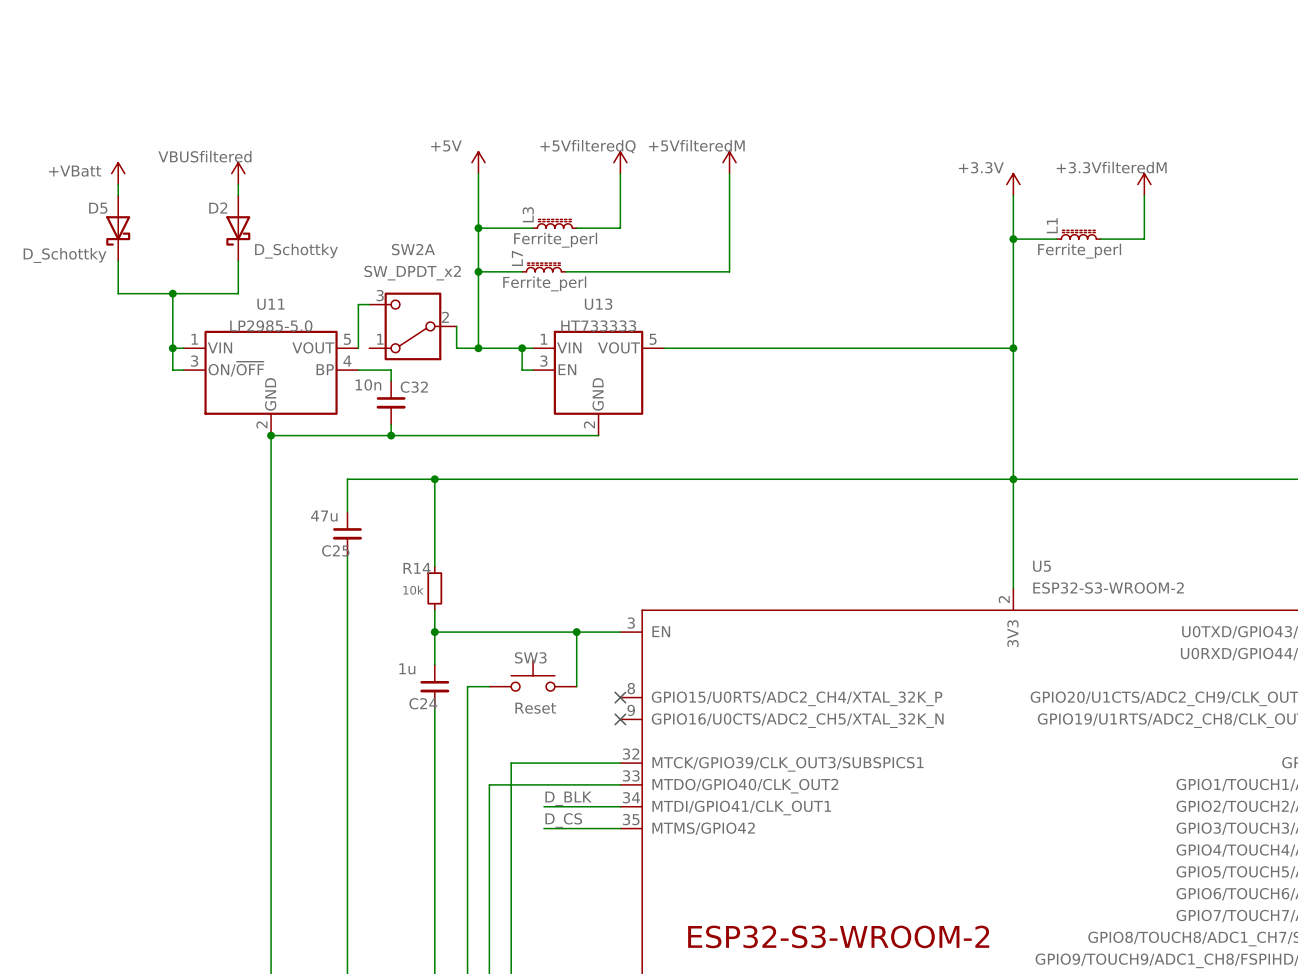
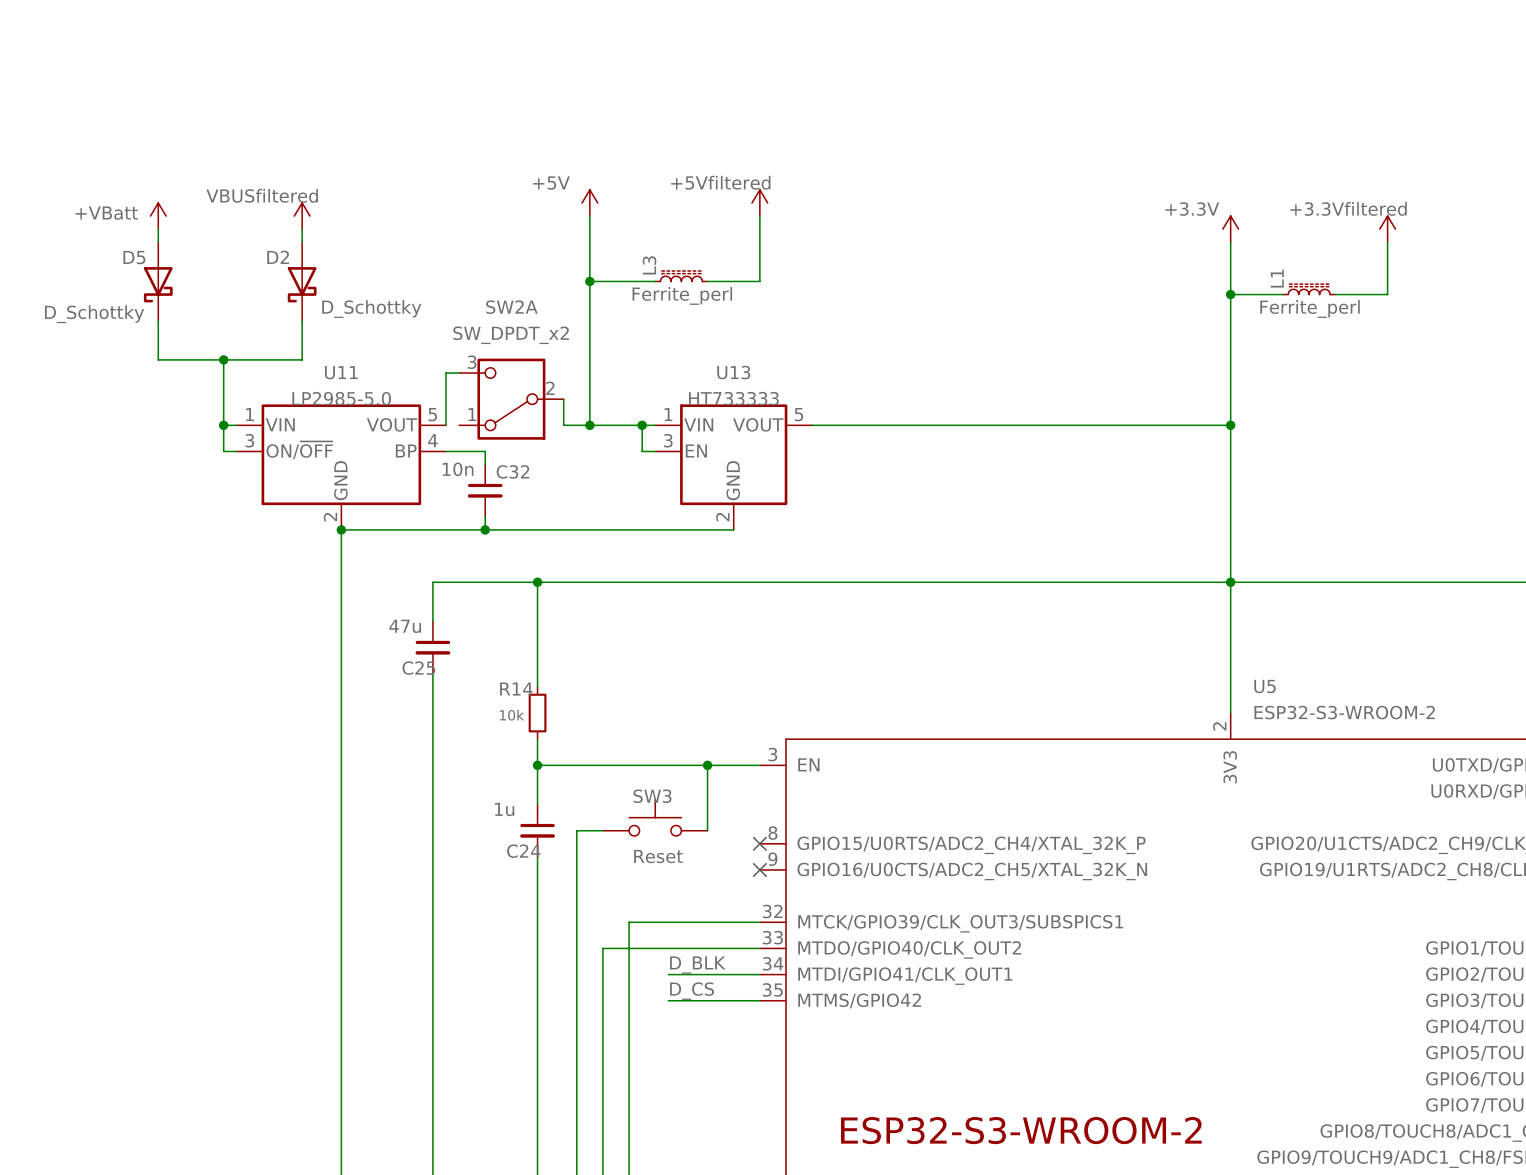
power symbol: +5VfilteredQ (620, 162) -> +5Vfiltered (759, 203)
power symbol: +5VfilteredM (729, 162) -> none
wire: (729, 173) (729, 271) (565, 271) -> none
power symbol: +3.3VfilteredM (1144, 184) -> +3.3Vfiltered (1387, 229)
L7: Ferrite_perl (543, 267) -> none
wire: (478, 271) (522, 271) -> none
junction: (478, 271) -> none

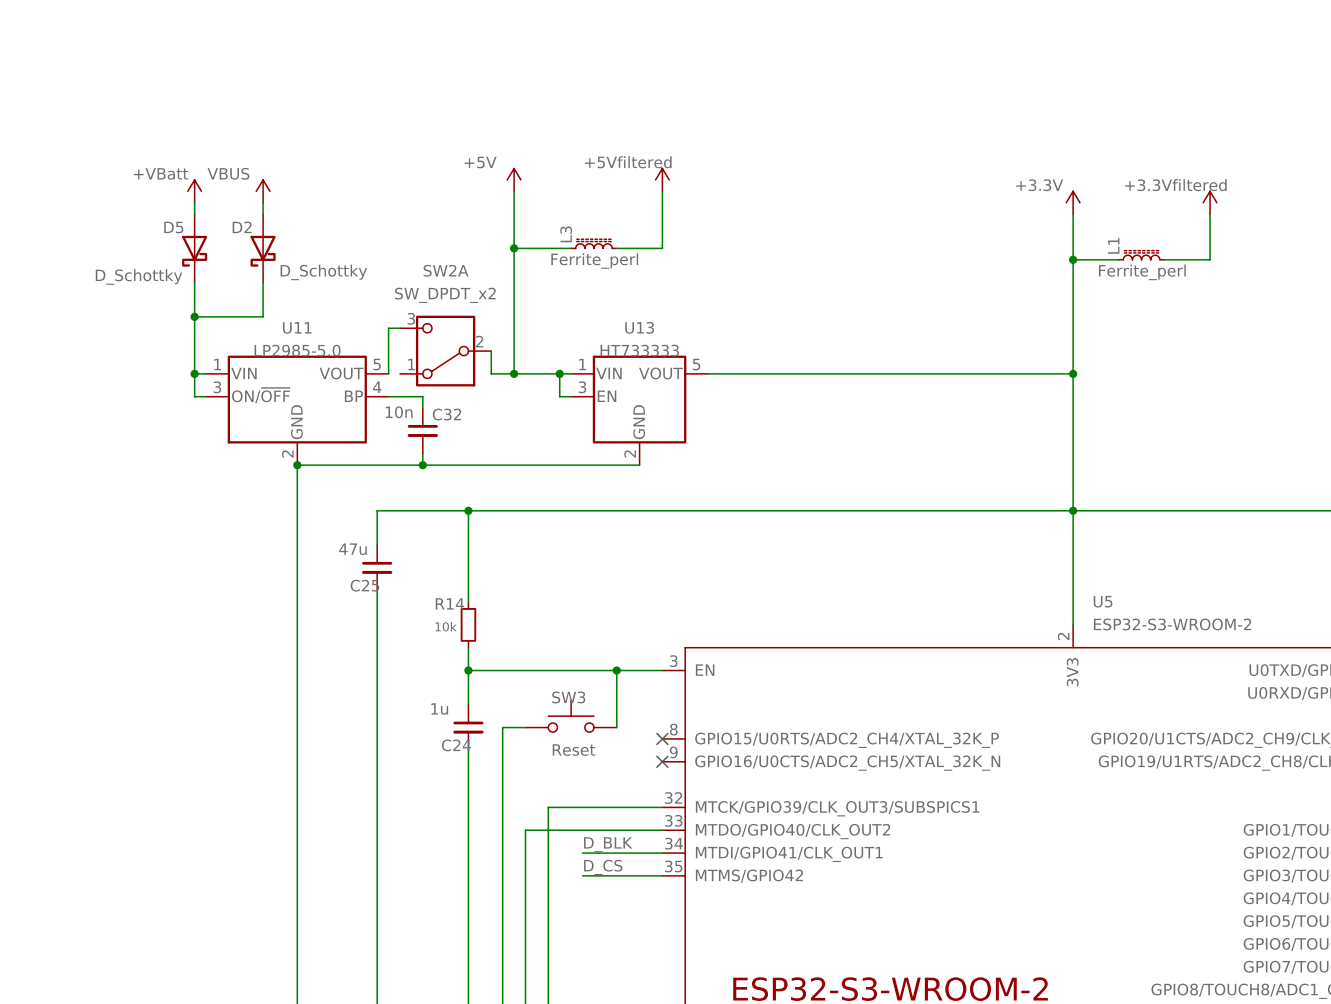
power symbol text position: +VBatt (106, 213) -> +VBatt (161, 173)
power symbol position: +VBatt (158, 216) -> +VBatt (194, 191)
power symbol: VBUSfiltered (302, 216) -> VBUS (263, 191)
wire: (158, 229) (158, 242) -> (194, 202) (194, 214)
D5 position: (158, 281) -> (194, 248)
wire: (158, 320) (158, 359) (223, 359) -> (194, 282) (194, 316)

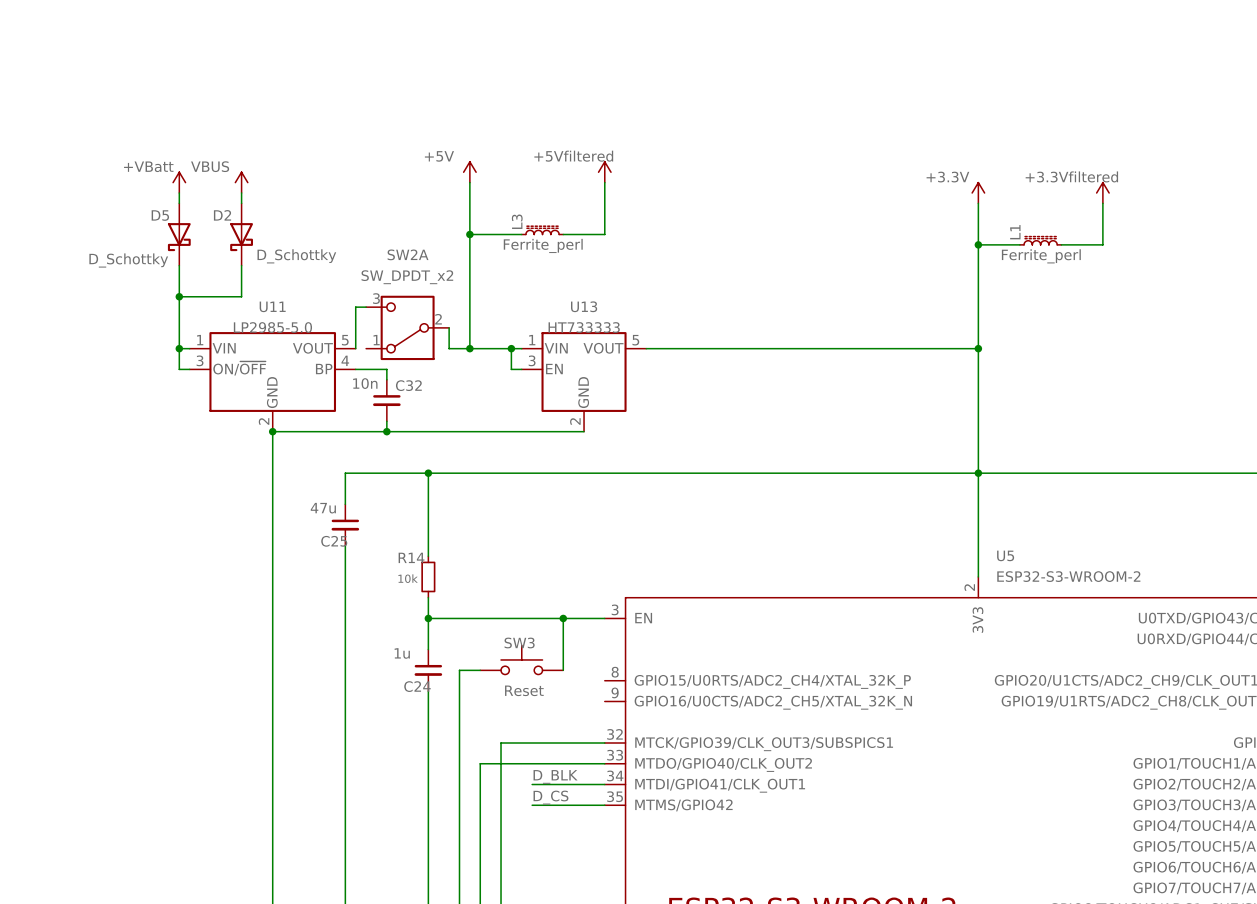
no-connect mark: (662, 738) -> none
no-connect mark: (662, 761) -> none

